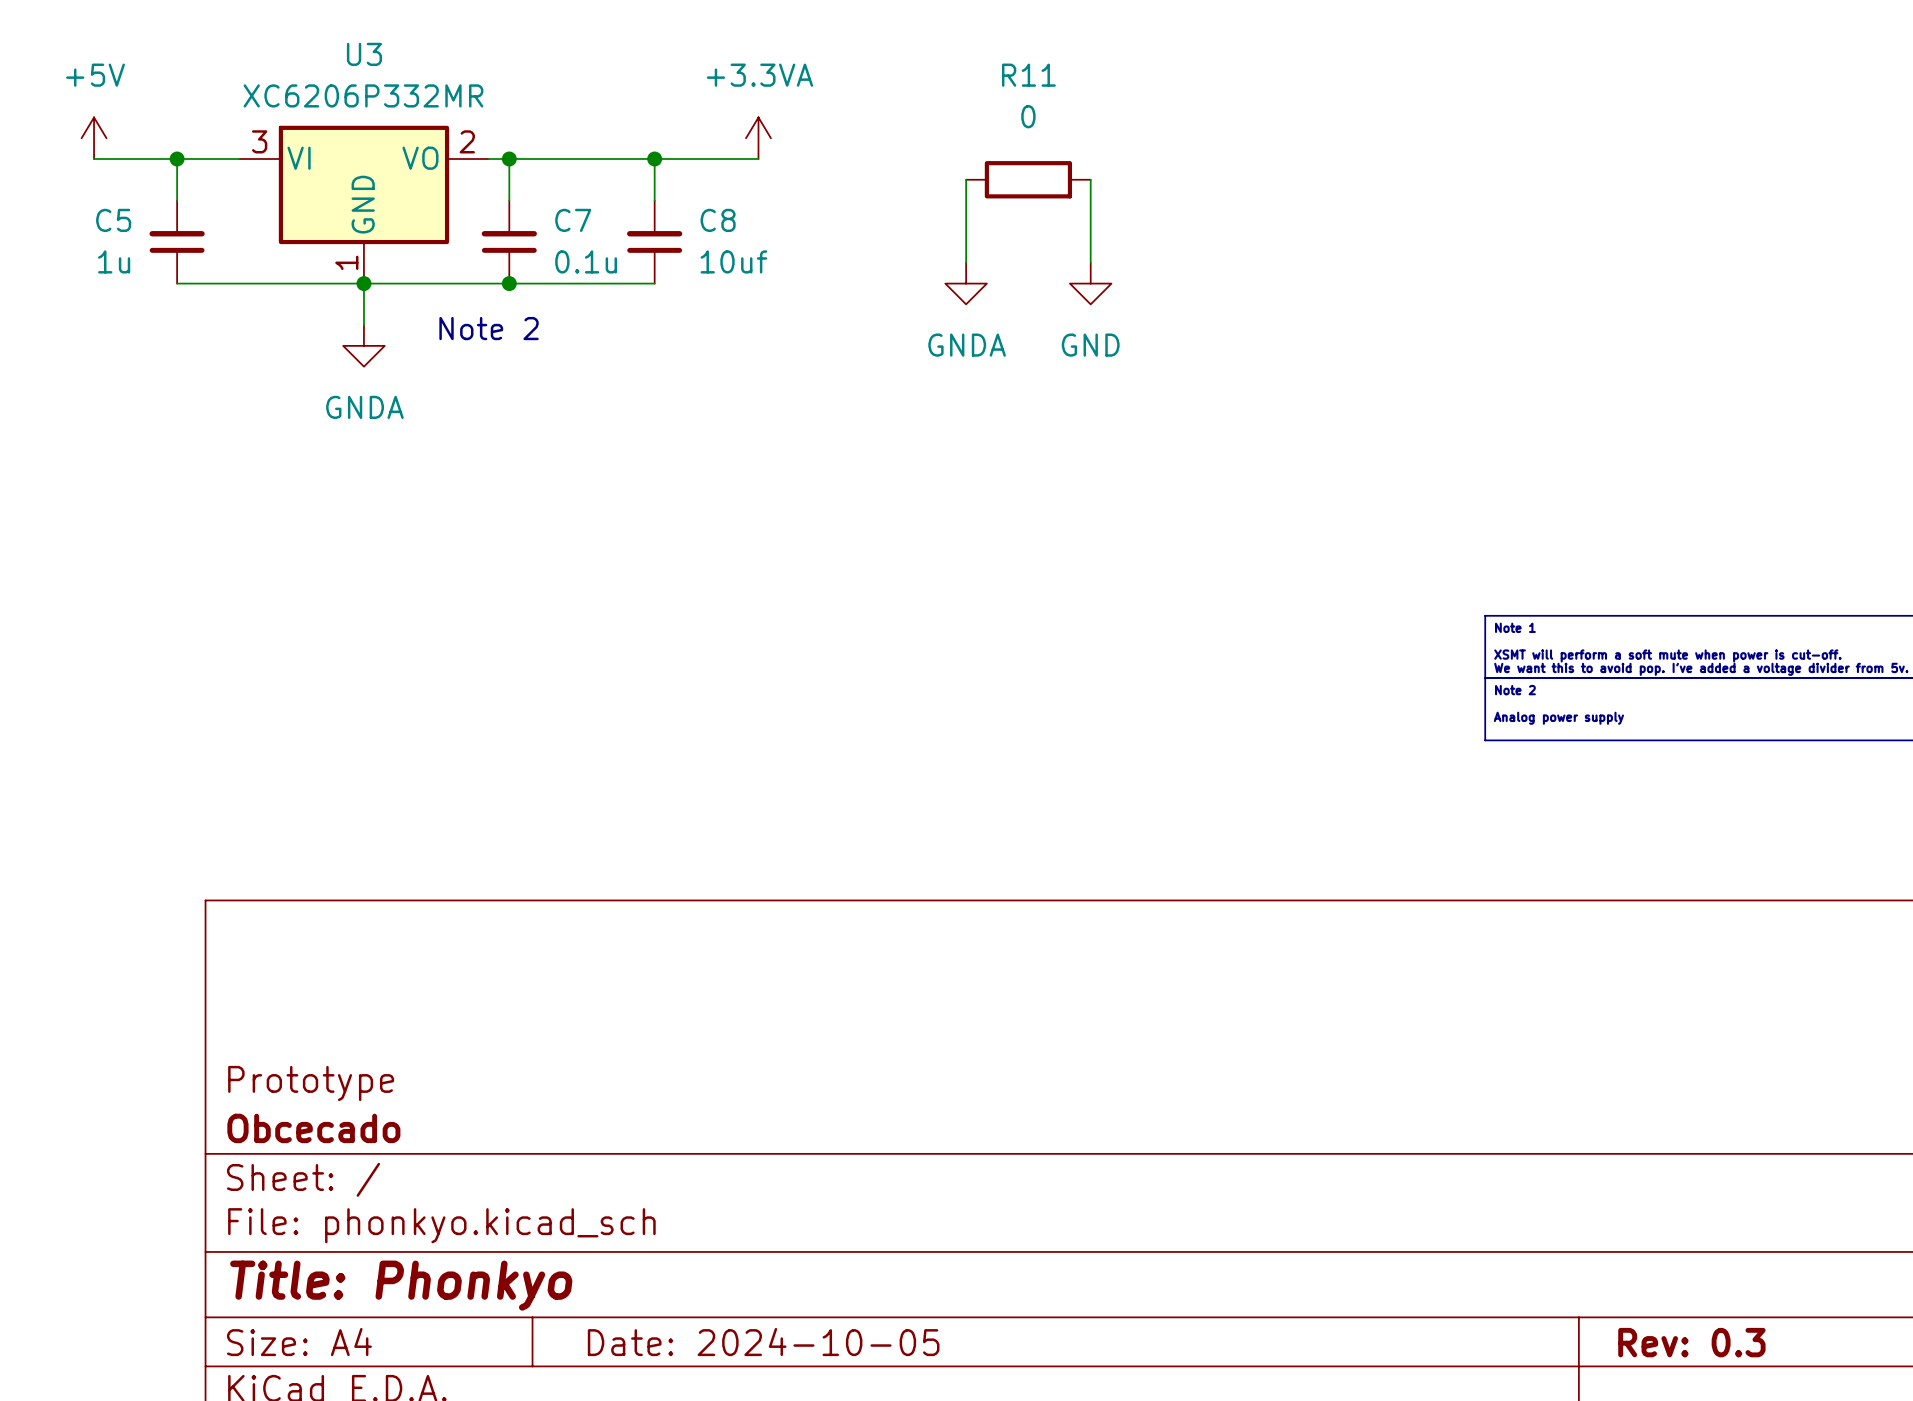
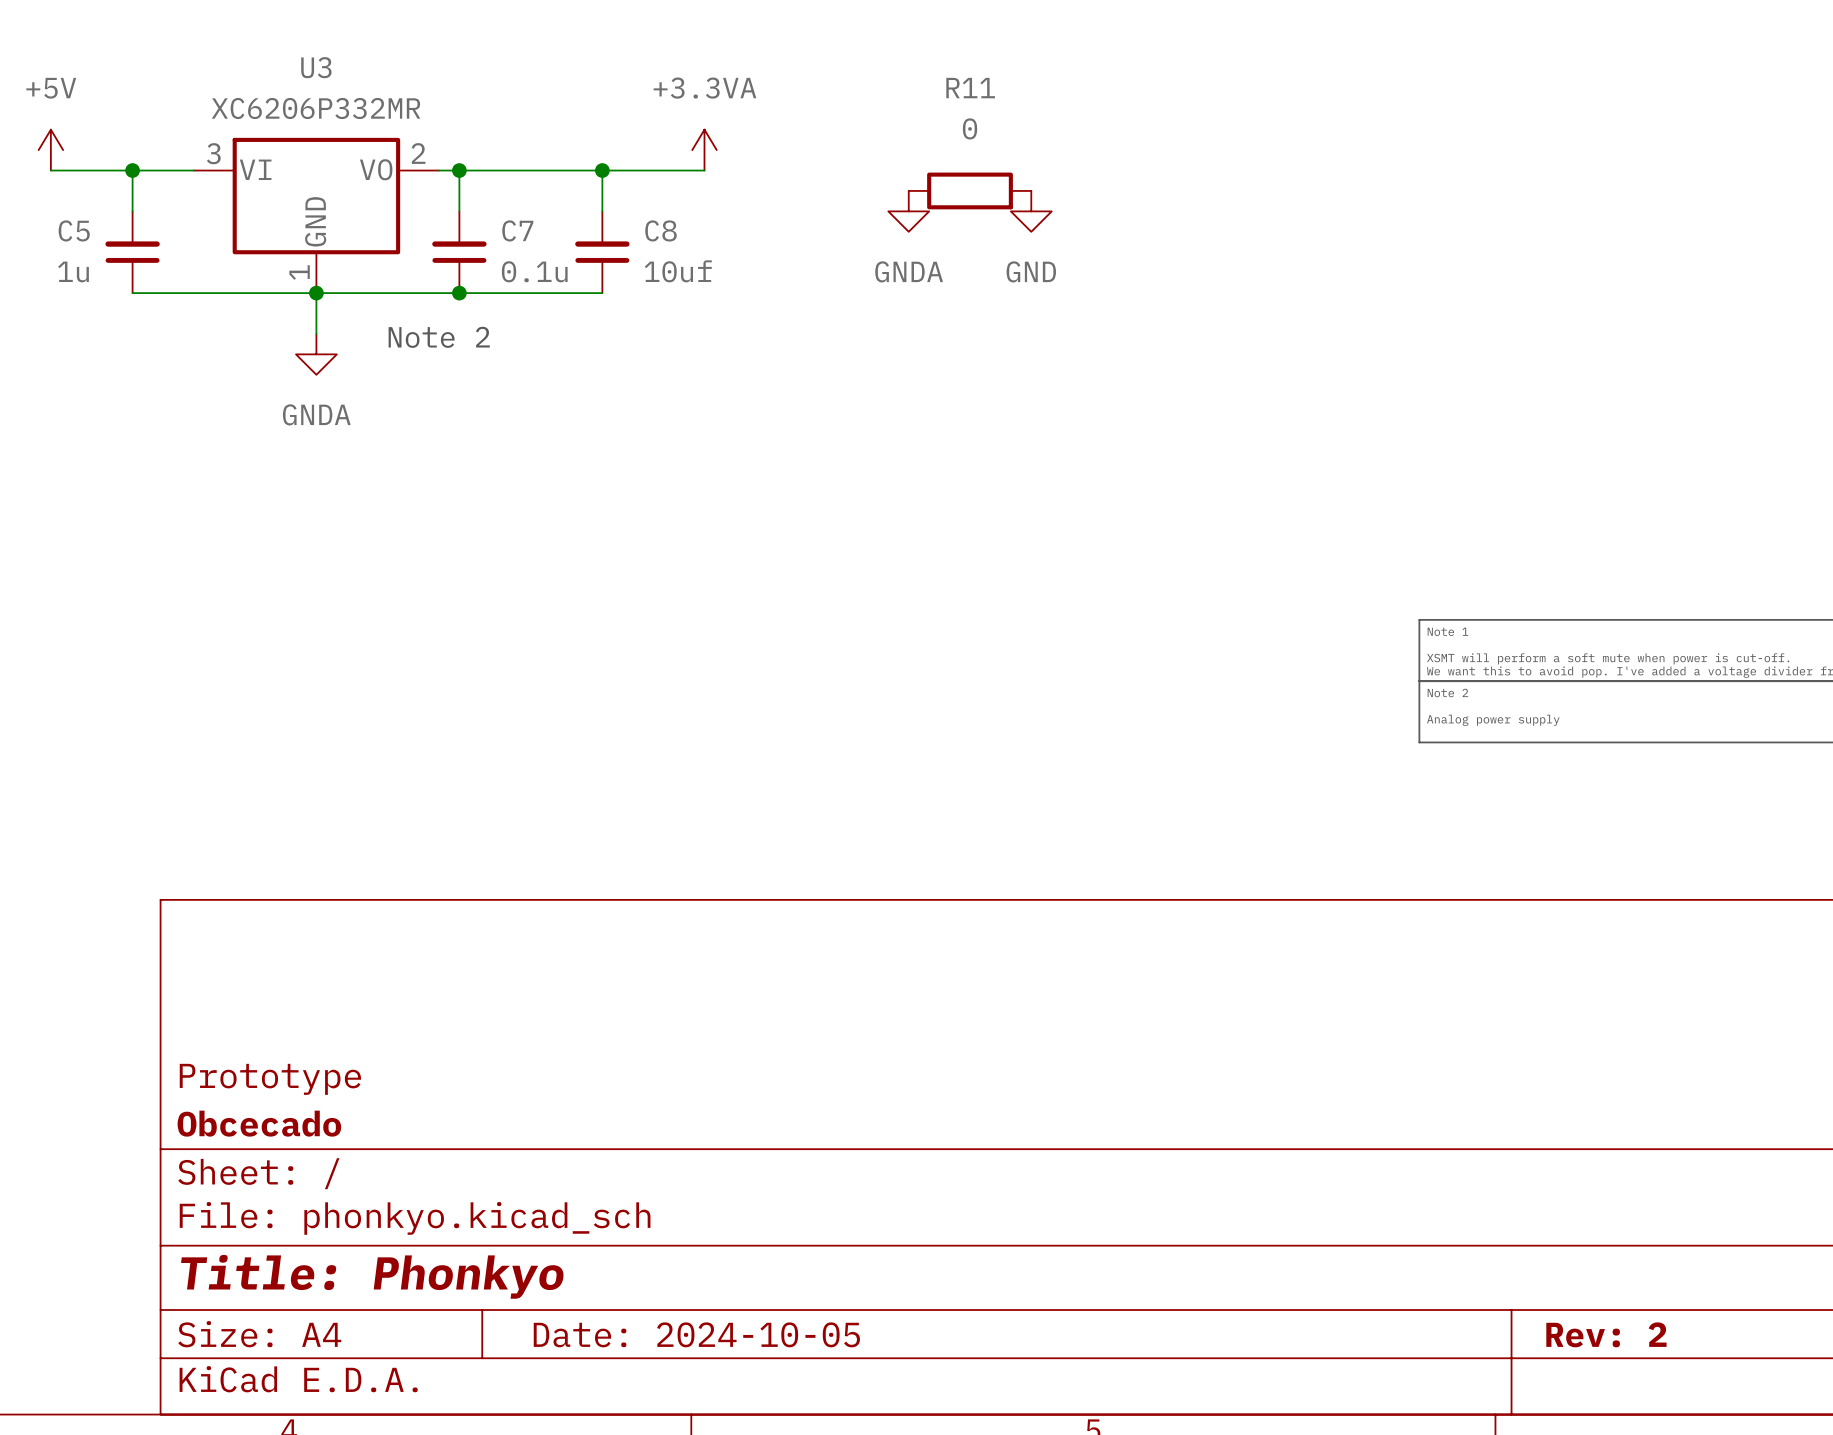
wire: (966, 179) (966, 262) -> none
wire: (1090, 179) (1090, 262) -> none
power symbol position: GNDA (966, 283) -> GNDA (908, 211)
power symbol position: GND (1090, 283) -> GND (1031, 211)
title block: Rev: 0.3 (1691, 1342) -> Rev: 2 (1606, 1334)

